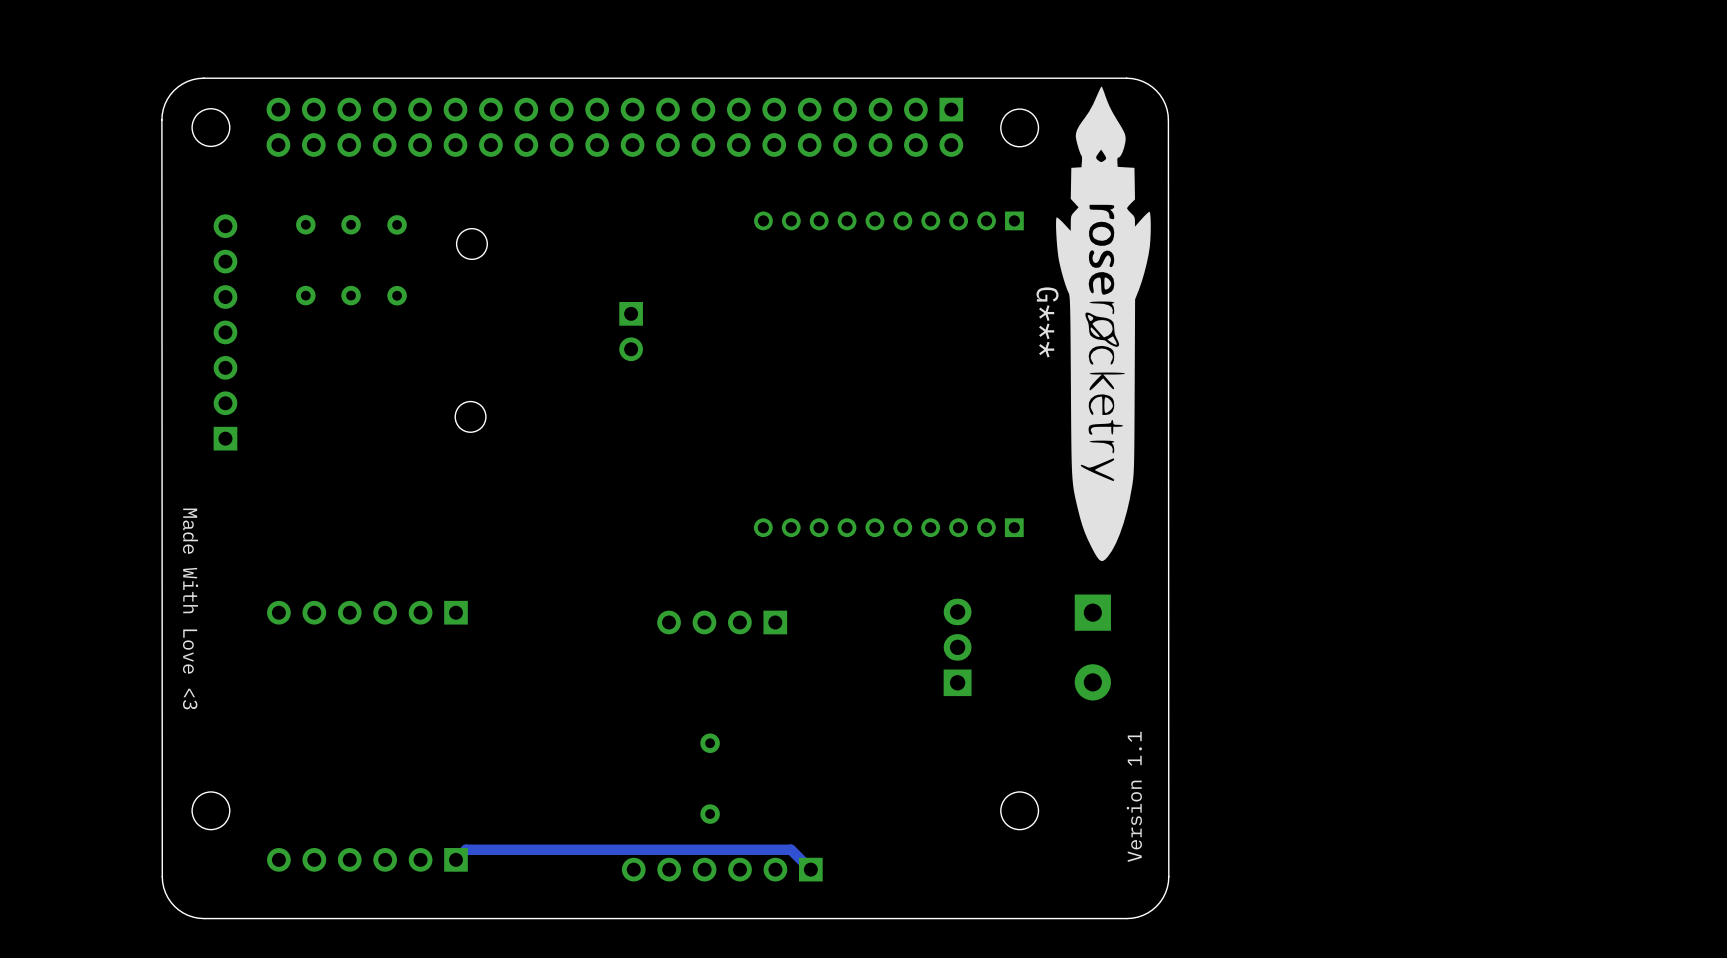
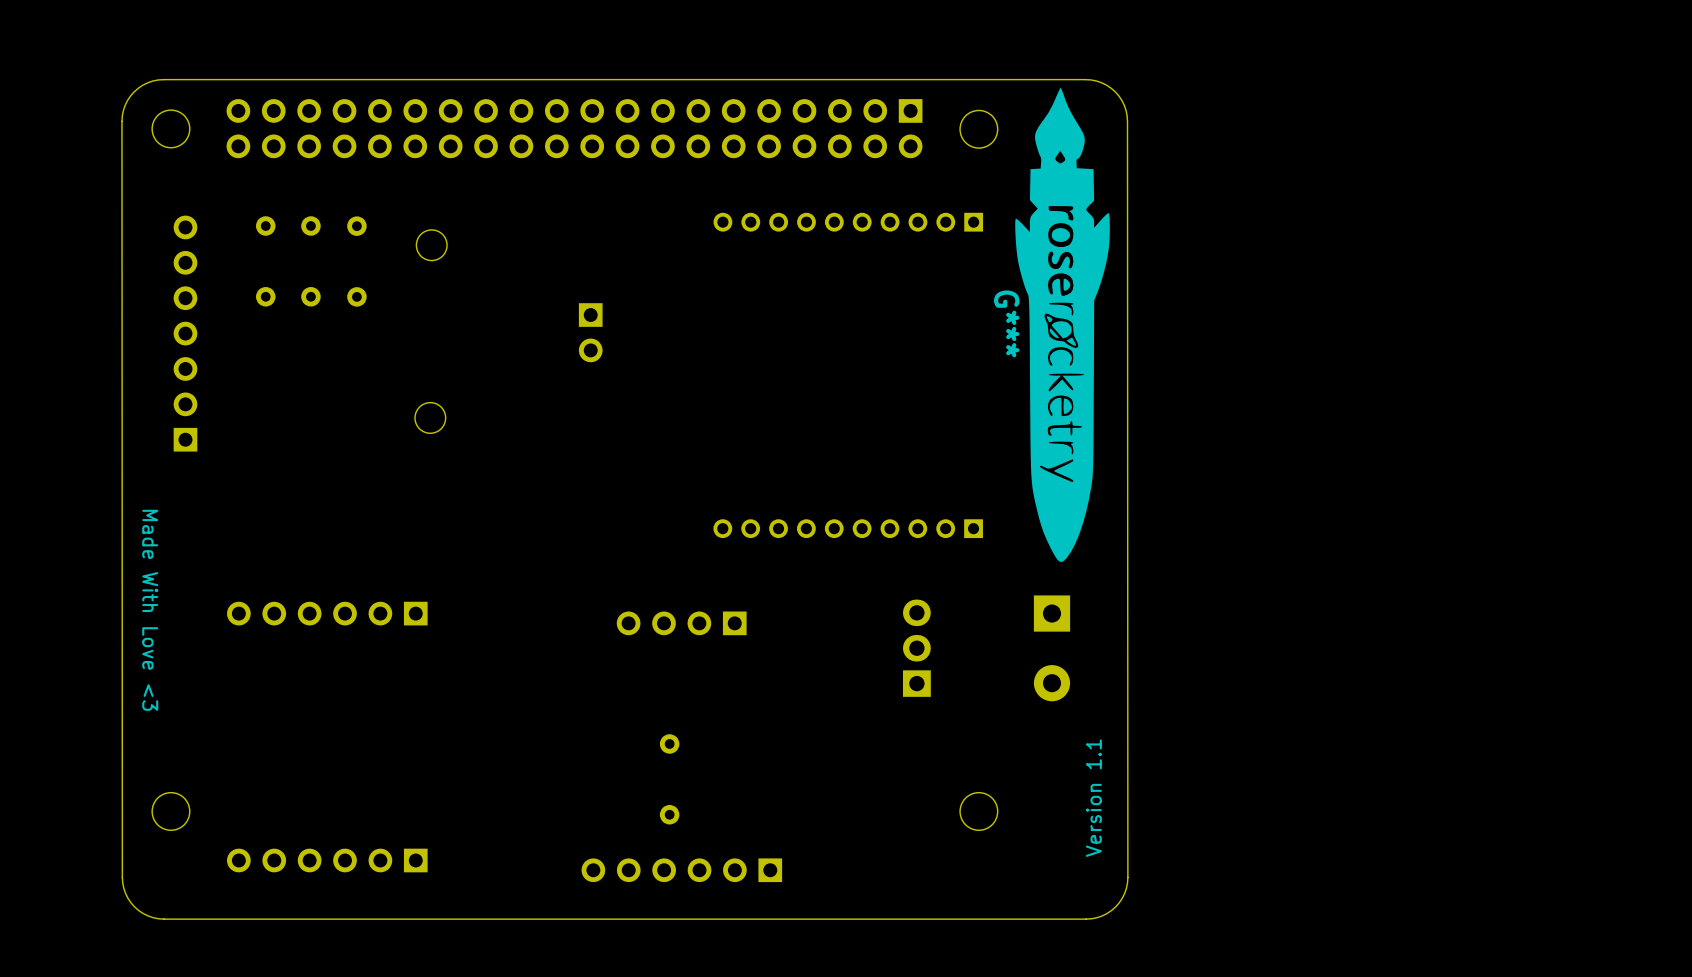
track: (455, 859) (466, 849) (790, 849) (810, 869) -> none

